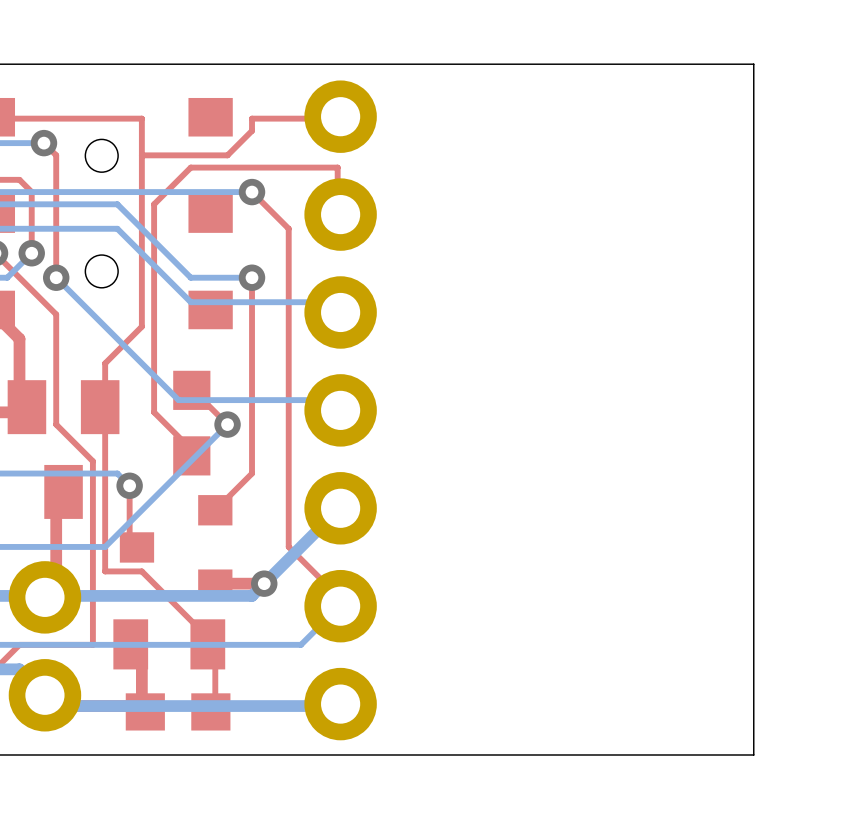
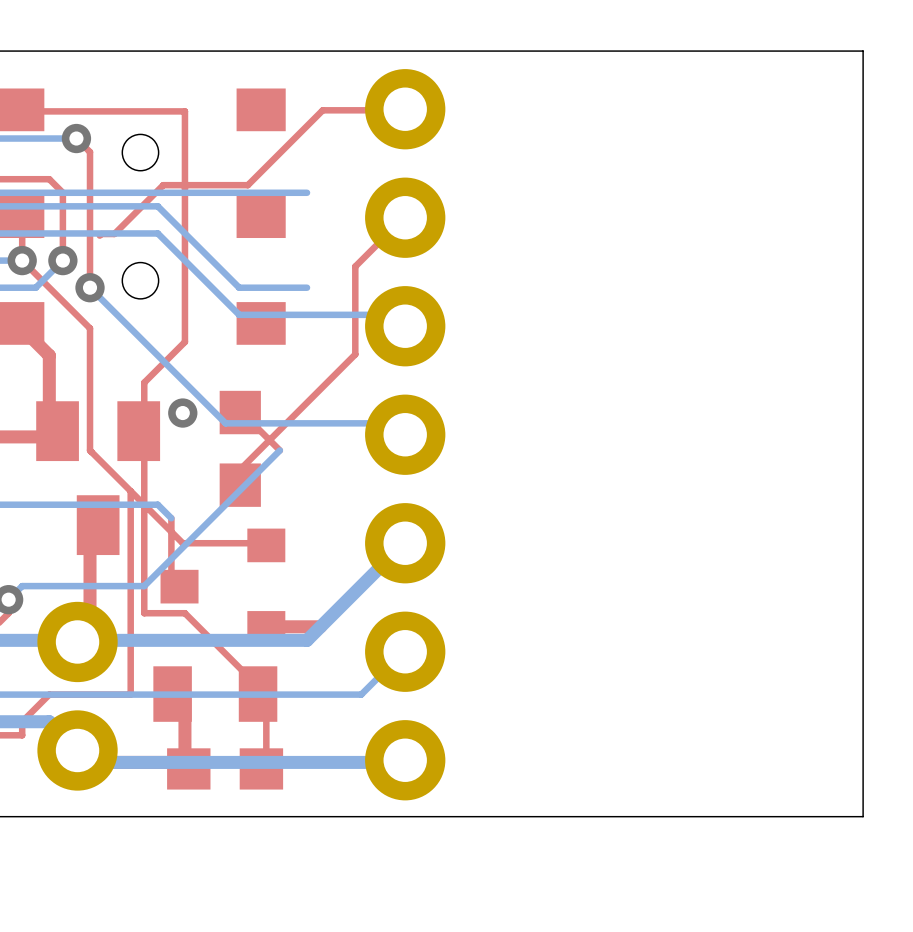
top track: (340, 116) (337, 118) (252, 118) (252, 130) (227, 155) (141, 155) -> (405, 109) (322, 110) (247, 185) (163, 185) (114, 234) (99, 235)
top track: (252, 192) (288, 228) (288, 546) (337, 595) (340, 606) -> none
via: (252, 192) -> none
top track: (340, 214) (337, 204) (337, 167) (190, 167) (154, 204) (154, 412) (190, 449) (191, 455) -> (405, 217) (355, 266) (355, 354) (241, 468) (240, 485)
top track: (252, 277) (252, 473) (215, 510) -> (130, 491) (182, 543) (264, 543) (266, 545)
via: (252, 277) -> none
via: none -> (182, 413)
via: (227, 424) -> none
via: (129, 485) -> none
via: (264, 583) -> none

